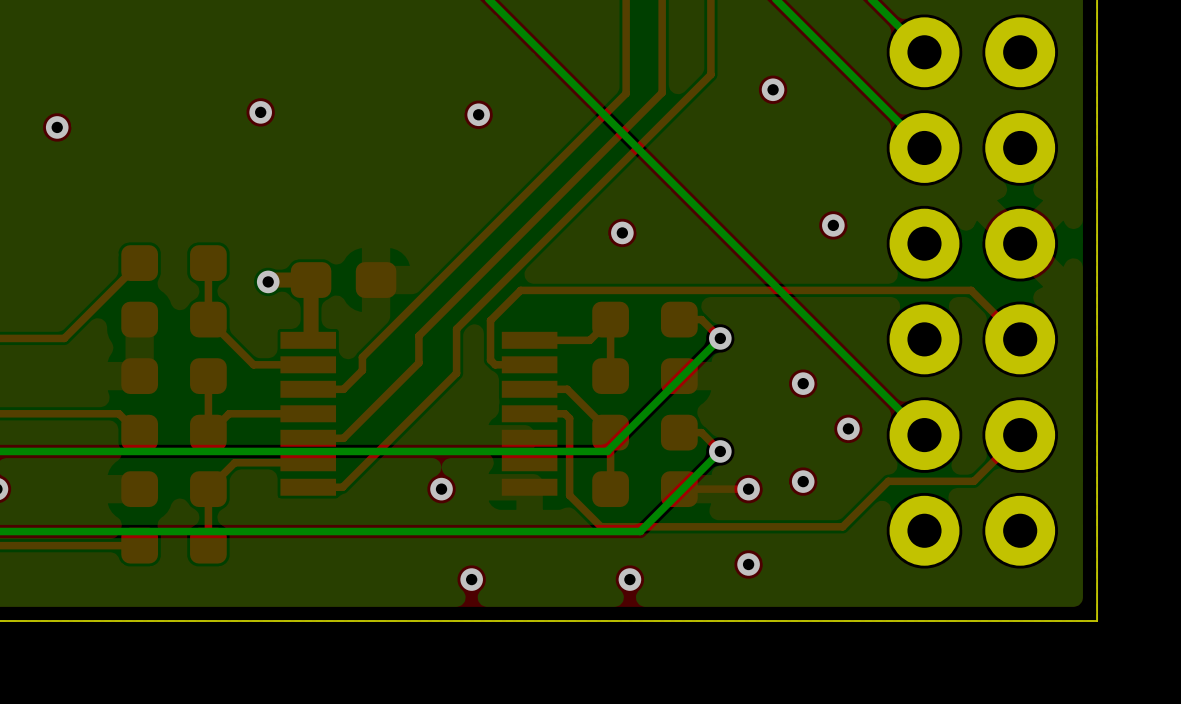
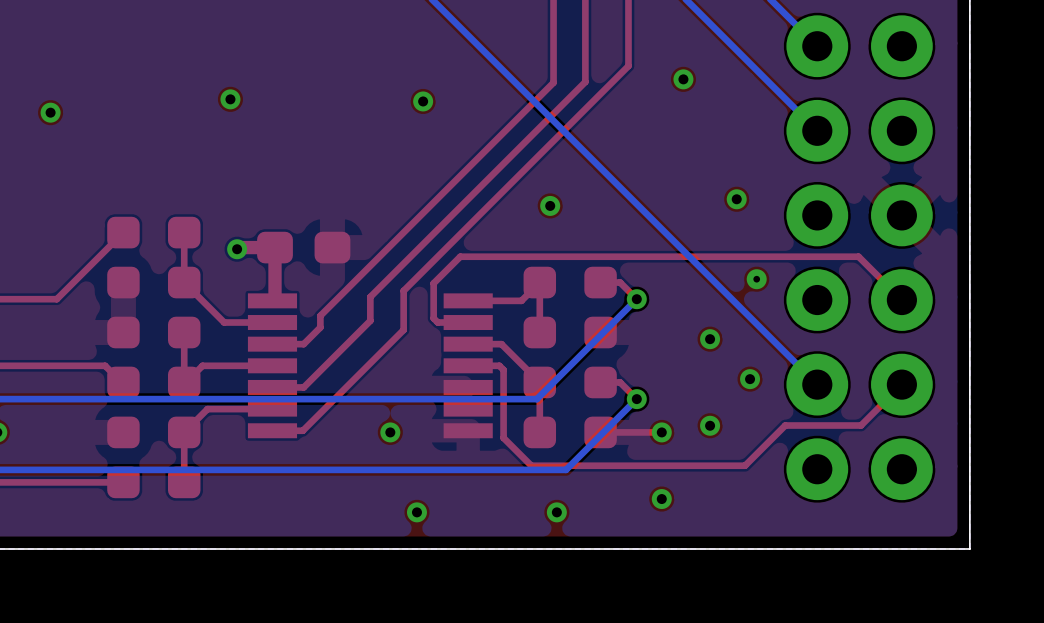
via: none -> (756, 279)

